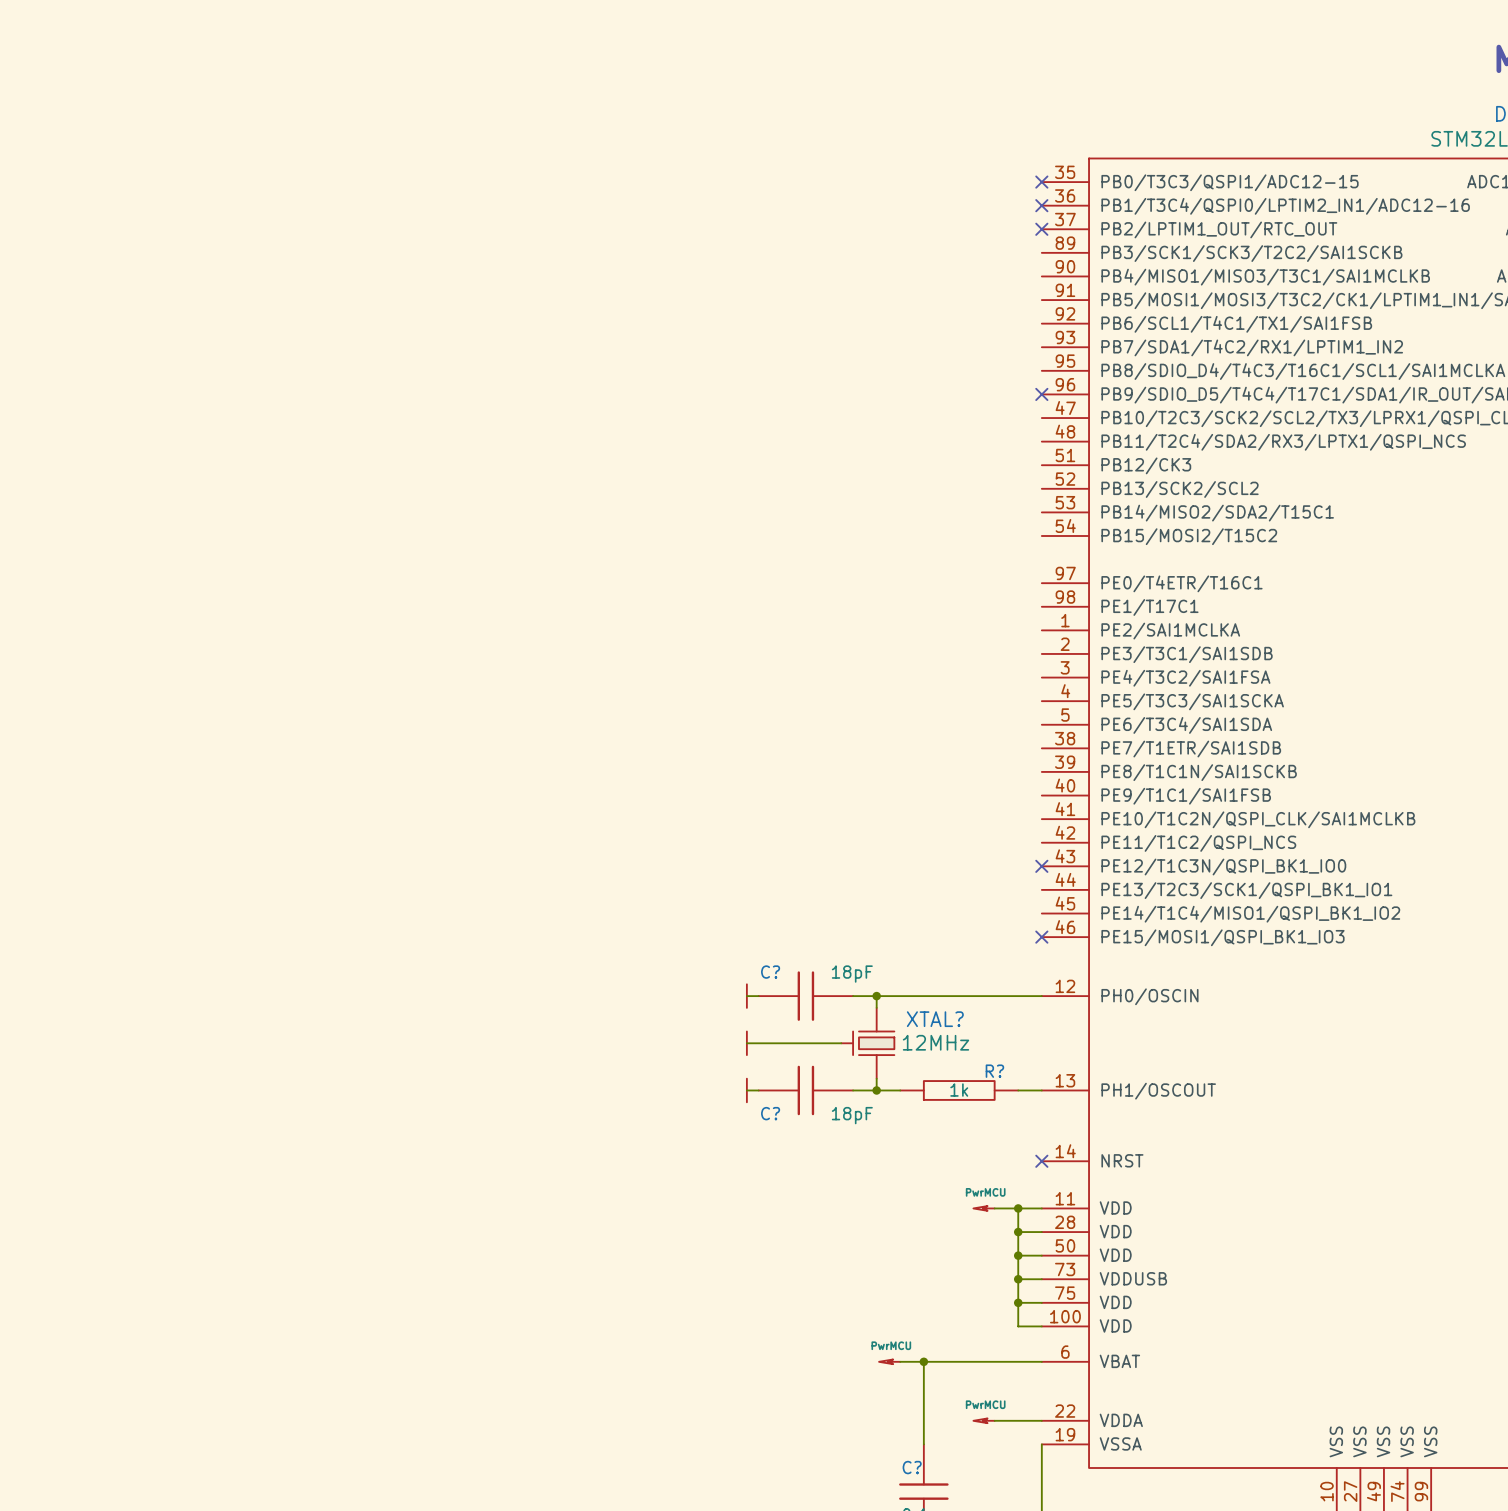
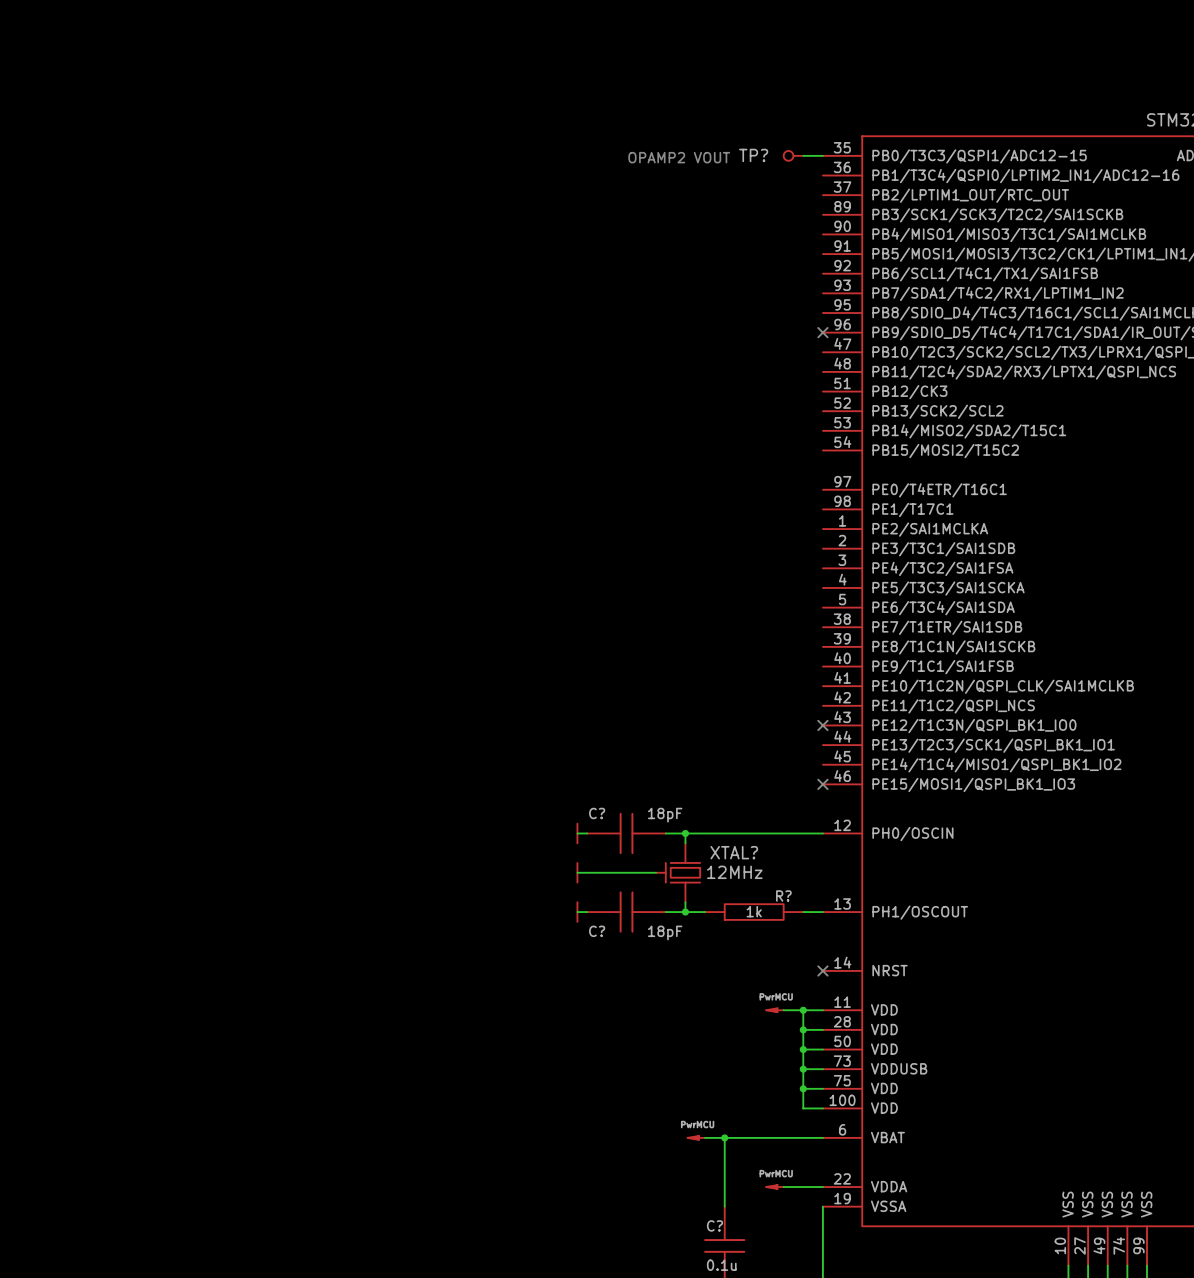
TP?: none -> (793, 155)
wire: none -> (803, 155) (822, 155)
no-connect mark: (1041, 182) -> none
text: none -> OPAMP2 VOUT (679, 157)
no-connect mark: (1041, 205) -> none
no-connect mark: (1041, 229) -> none

